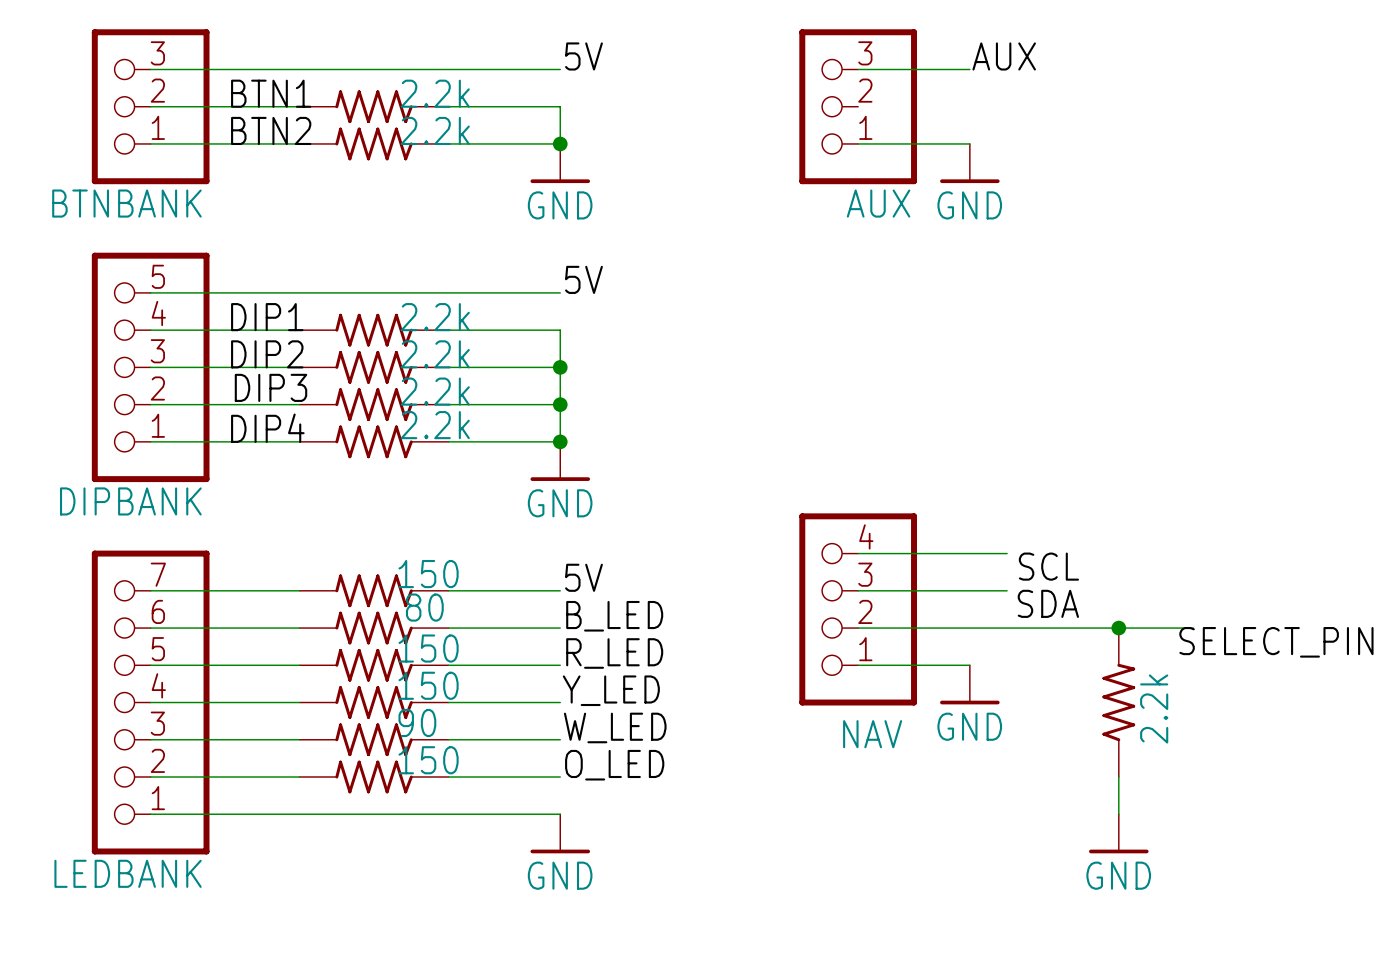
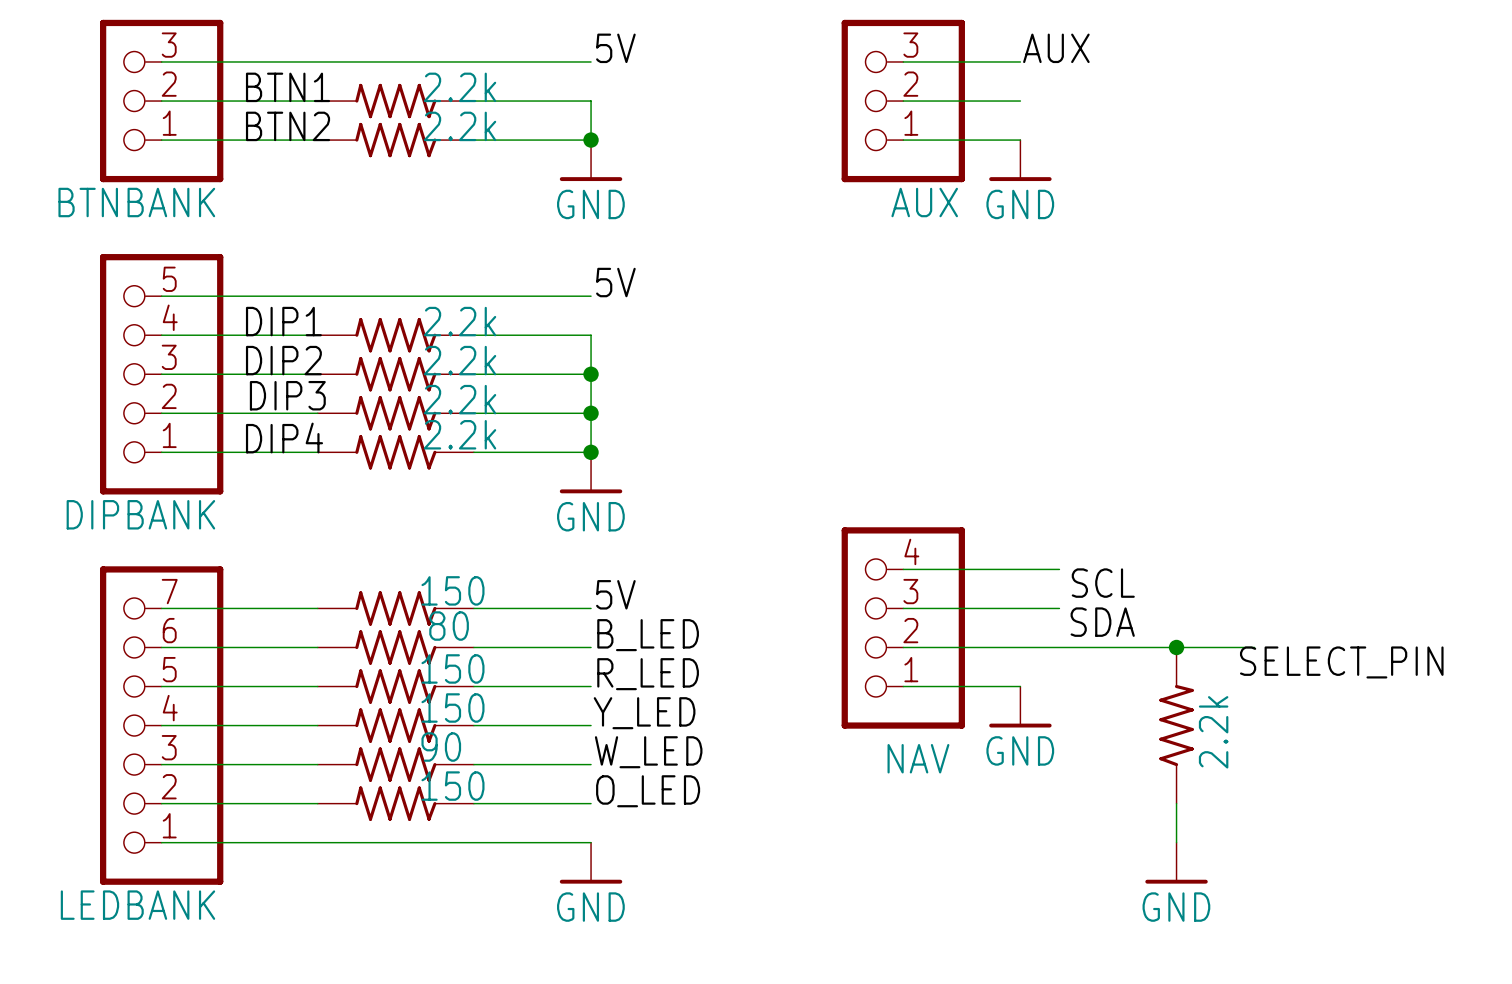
wire: none -> (903, 101) (1020, 101)

